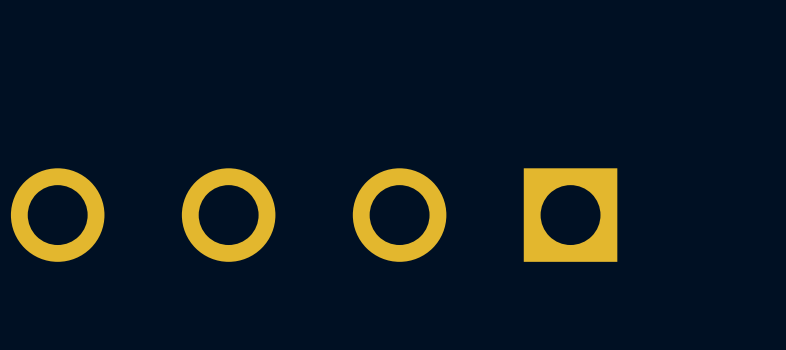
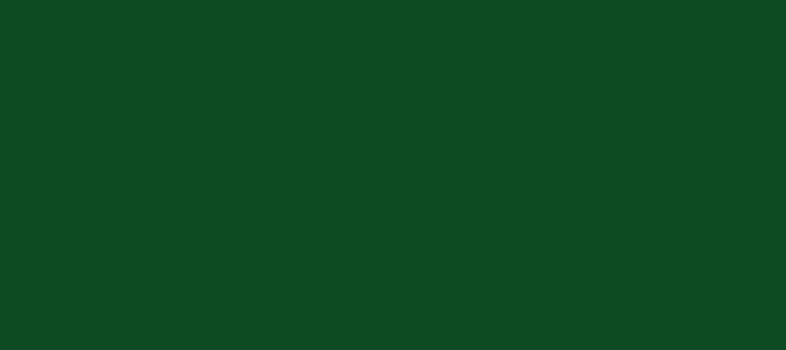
part: (314, 215) -> none

